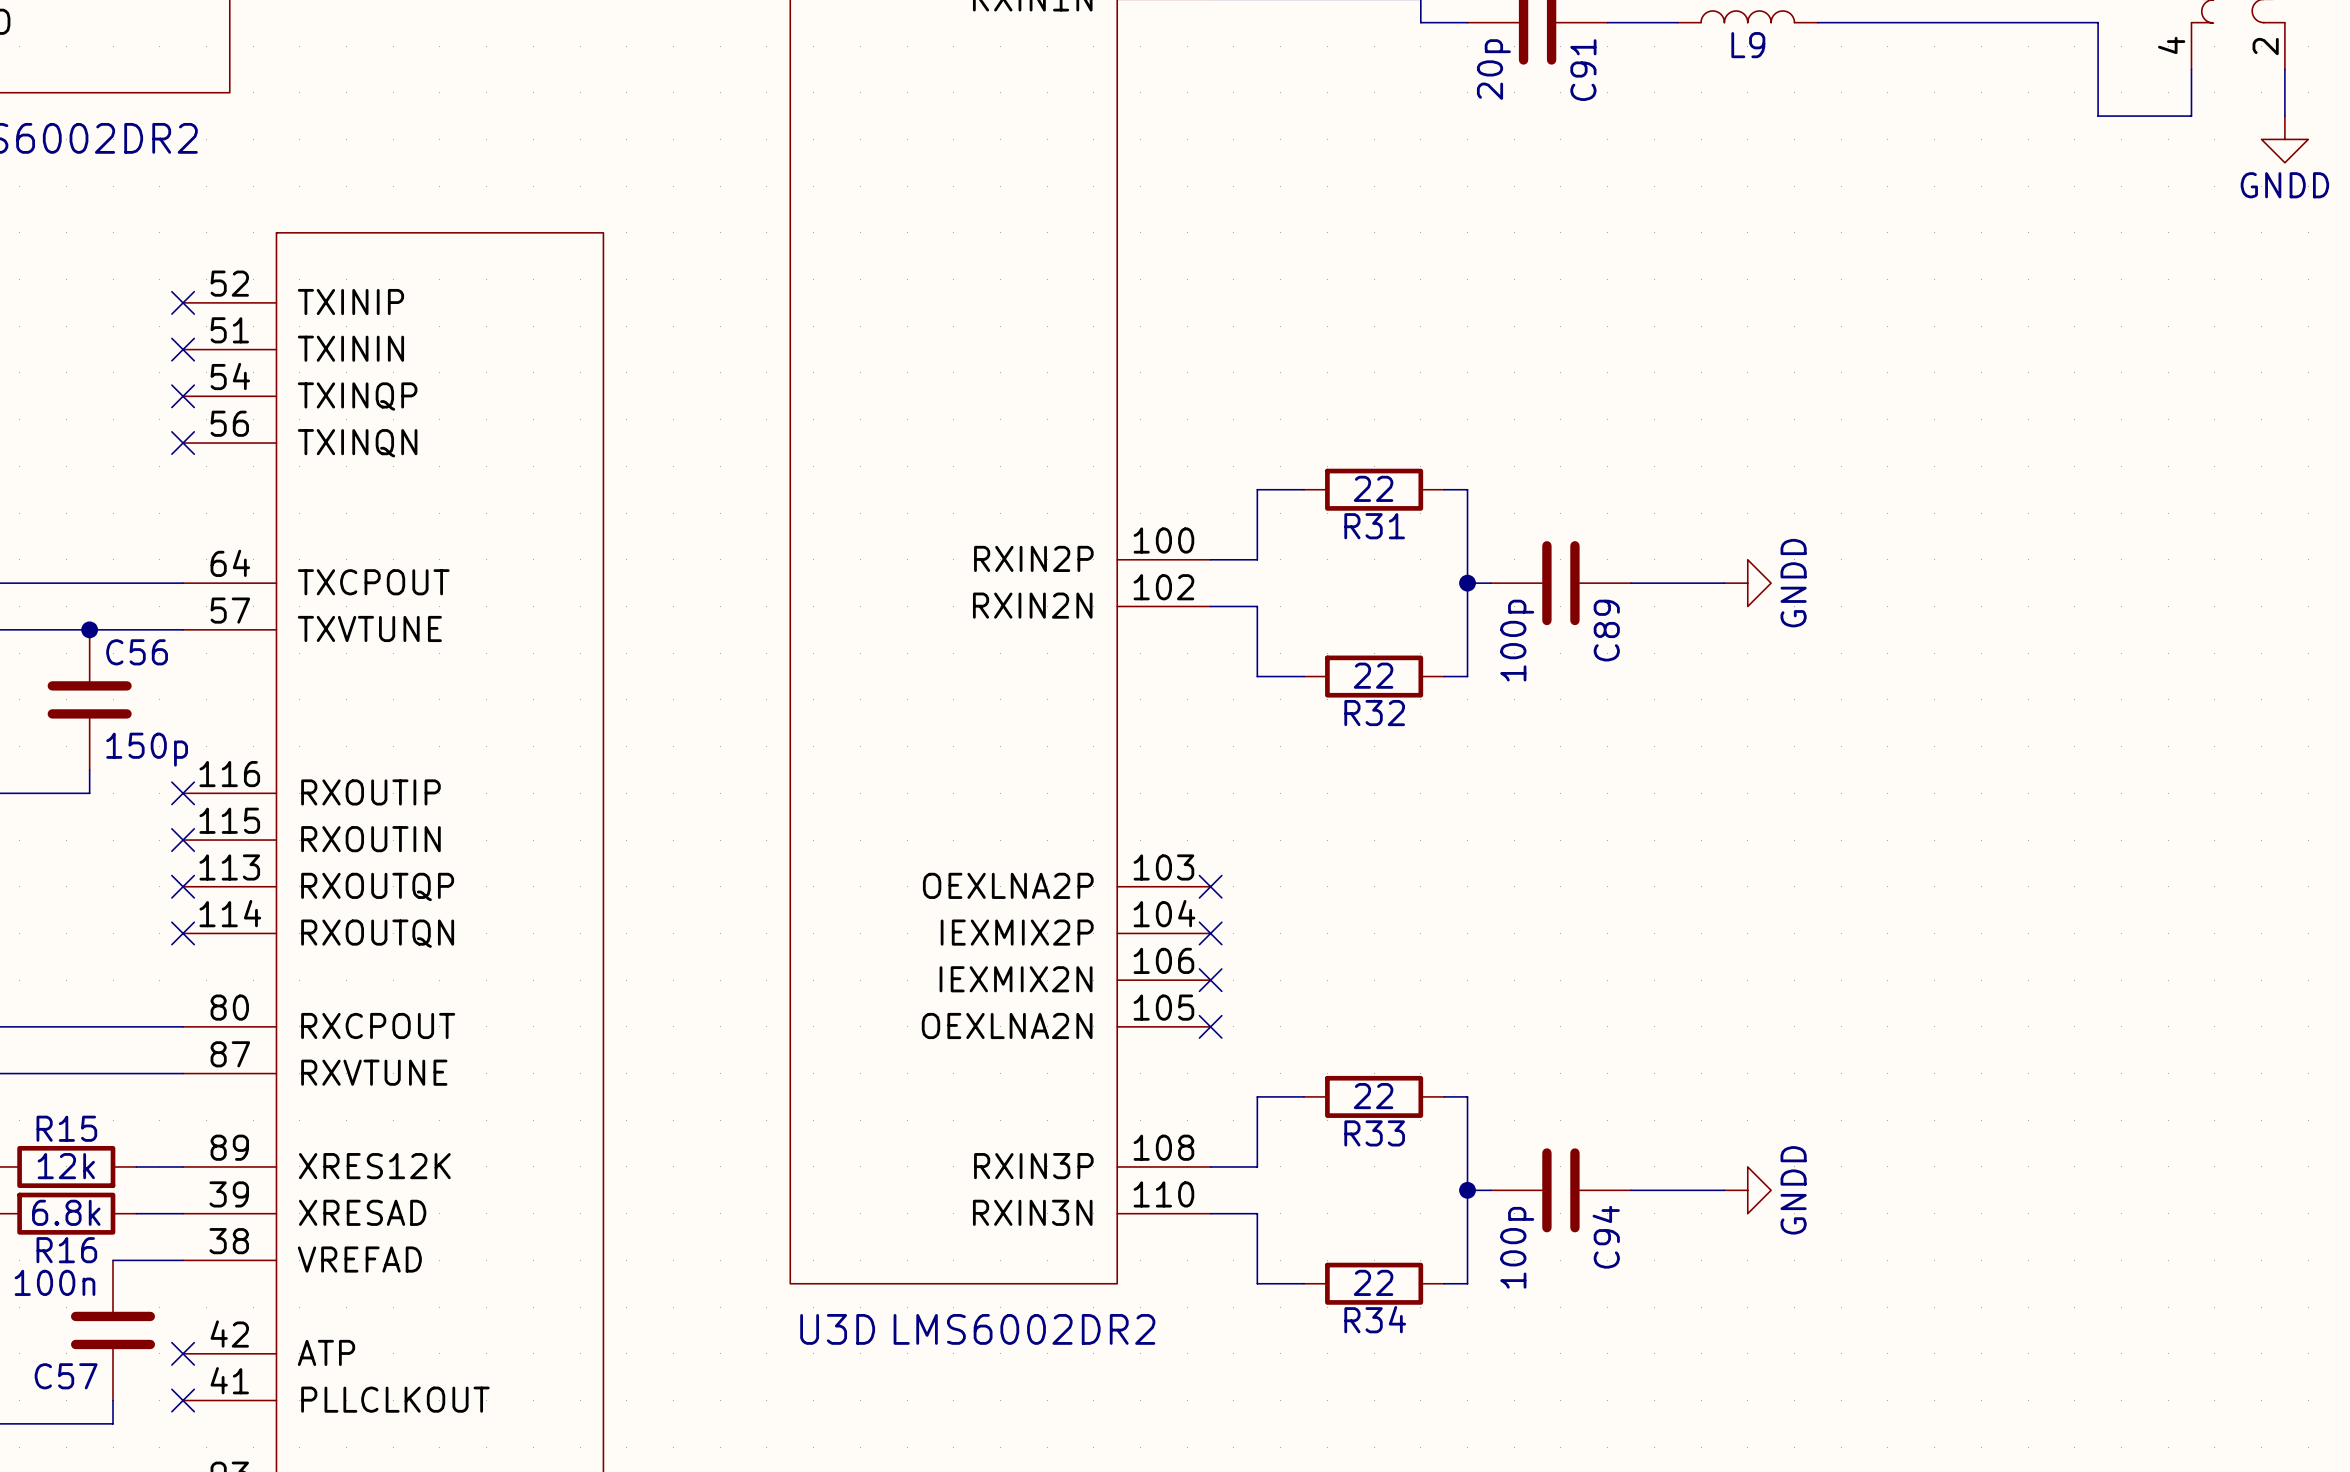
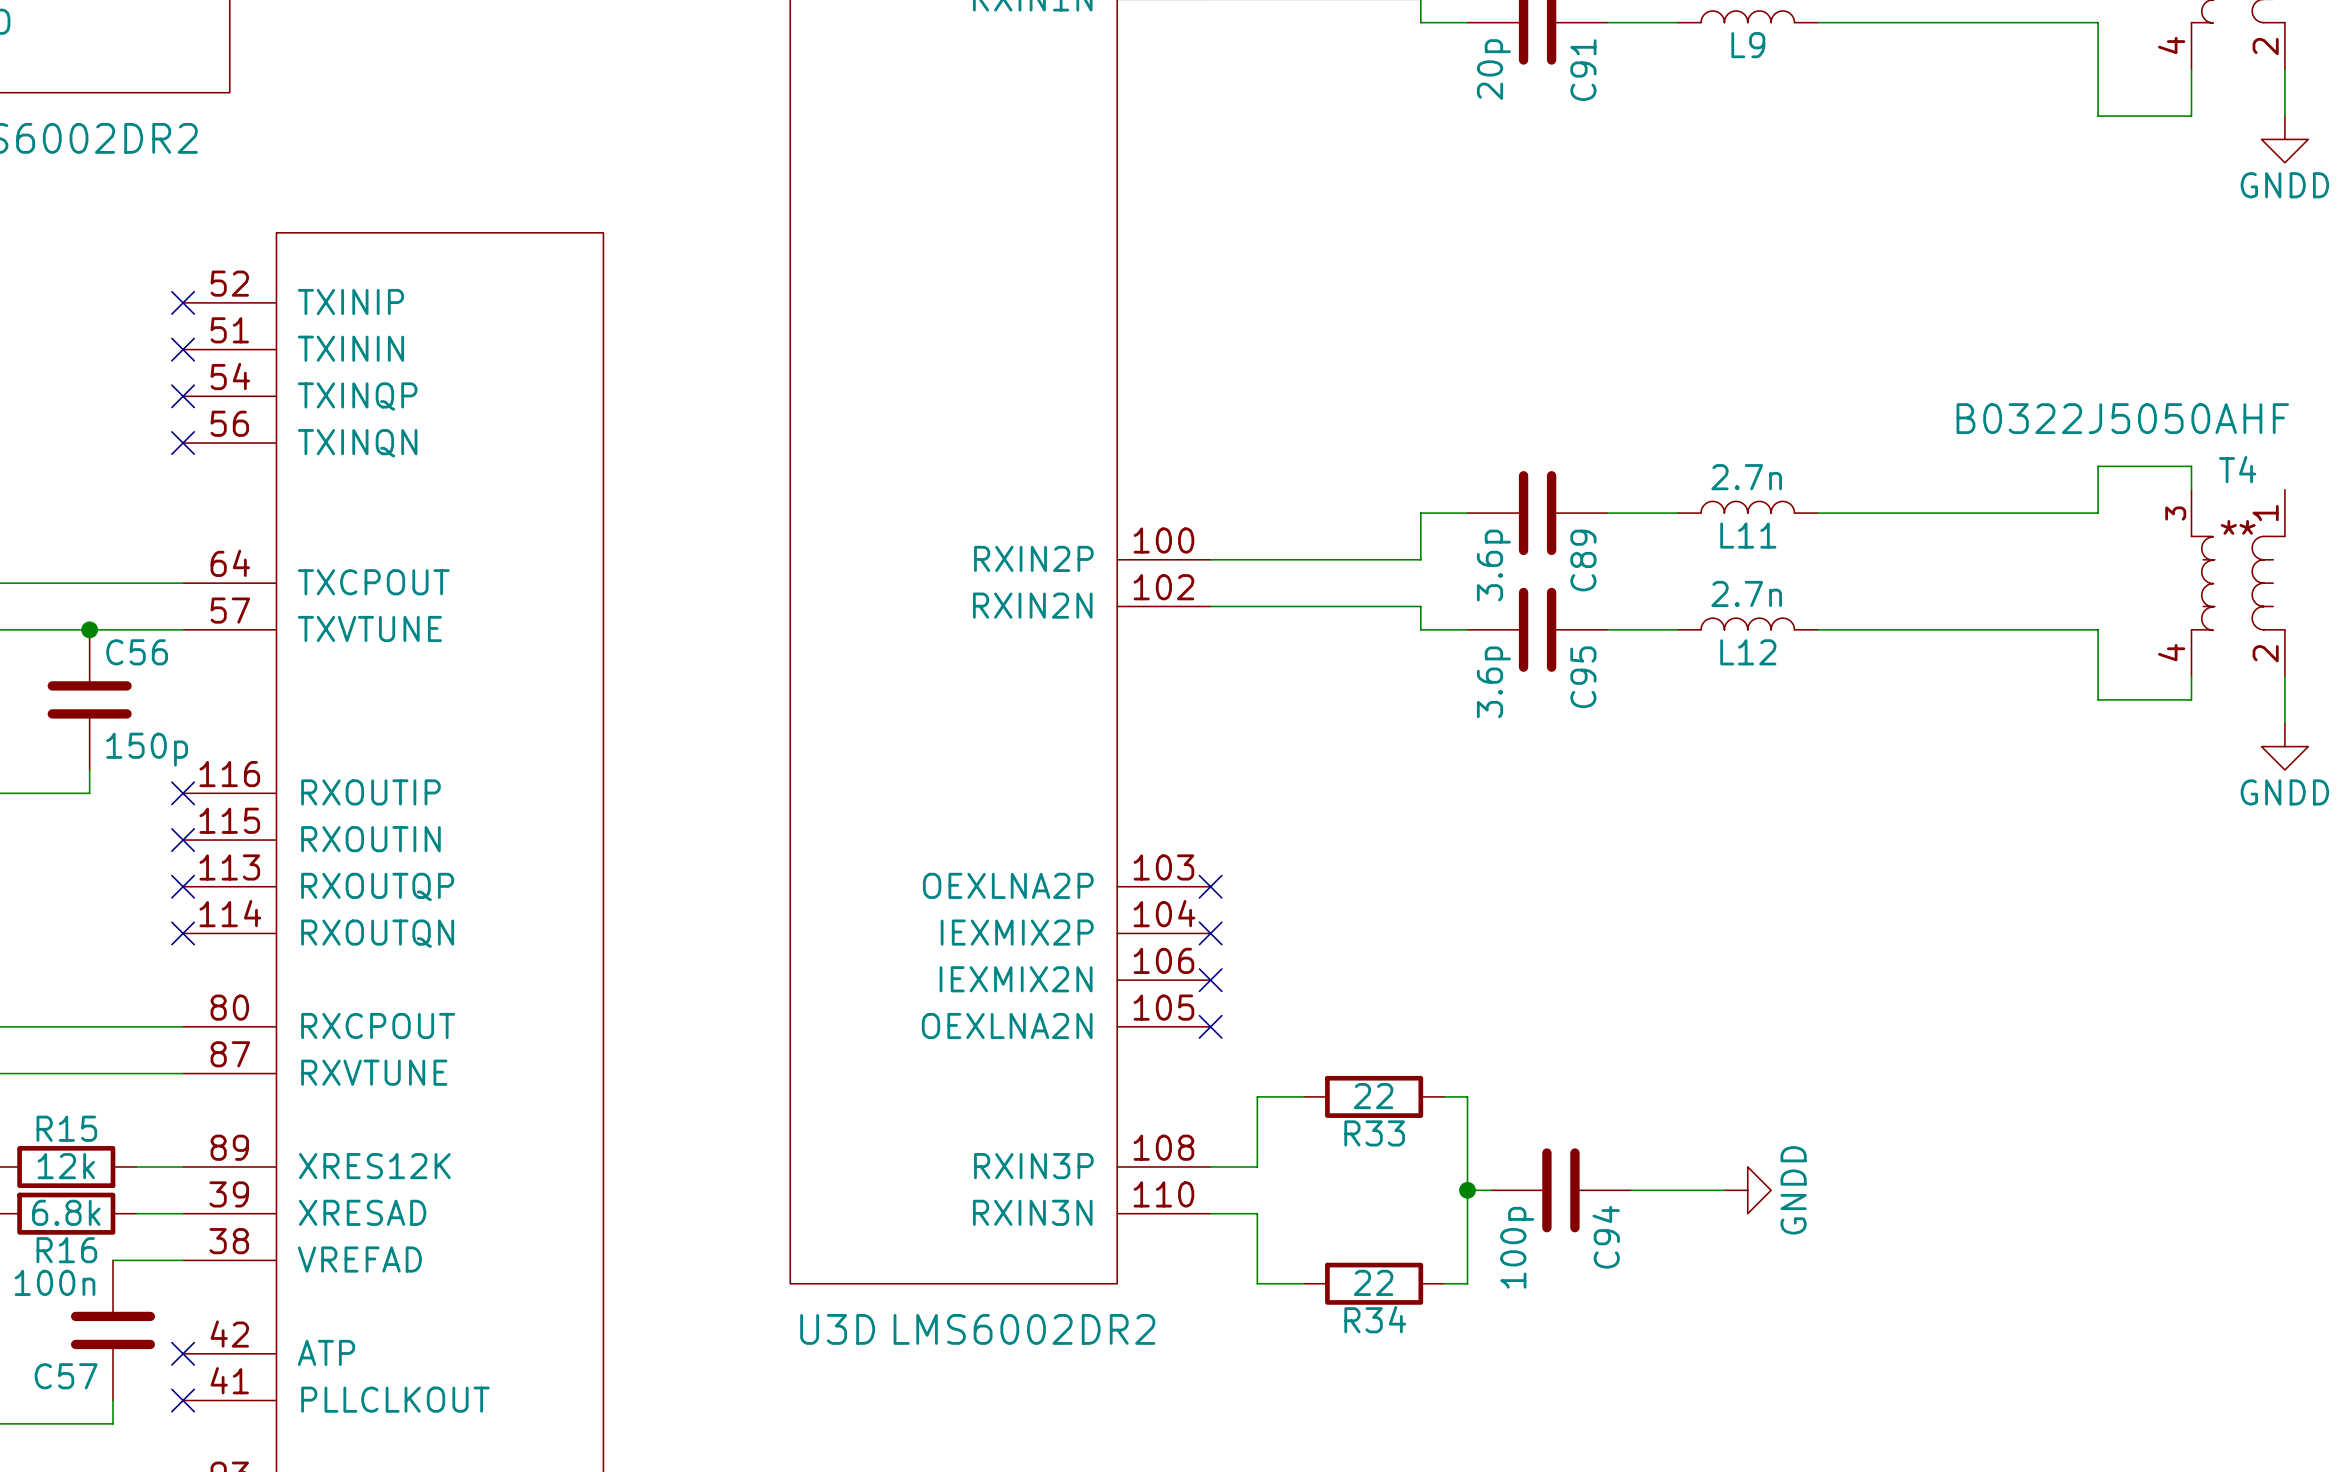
wire: (1304, 489) (1257, 489) (1257, 559) -> (1467, 513) (1420, 513) (1420, 559) (1257, 559)
R31: 22 (1374, 489) -> none
wire: (1444, 489) (1467, 489) (1467, 676) (1444, 676) -> none
wire: none -> (2191, 489) (2191, 466) (2098, 466) (2098, 513) (1817, 513)
L11: none -> 2.7n (1747, 507)
wire: none -> (1607, 513) (1677, 513)
wire: (1467, 583) (1490, 583) -> none
junction: (1467, 583) -> none
C89 position: (1560, 583) -> (1537, 513)
wire: (1631, 583) (1724, 583) -> none
power symbol: GNDD (1747, 583) -> none
T4: none -> (2238, 583)
wire: (1257, 606) (1257, 676) (1304, 676) -> (1257, 606) (1420, 606) (1420, 629) (1467, 629)
L12: none -> 2.7n (1747, 624)
C95: none -> 3.6p (1537, 629)
wire: none -> (1607, 629) (1677, 629)
wire: none -> (1817, 629) (2098, 629) (2098, 699) (2191, 699) (2191, 676)
C89 value: 100p (1517, 640) -> 3.6p (1493, 565)
R32: 22 (1374, 676) -> none
wire: none -> (2284, 676) (2284, 723)
power symbol: none -> GNDD (2284, 746)

